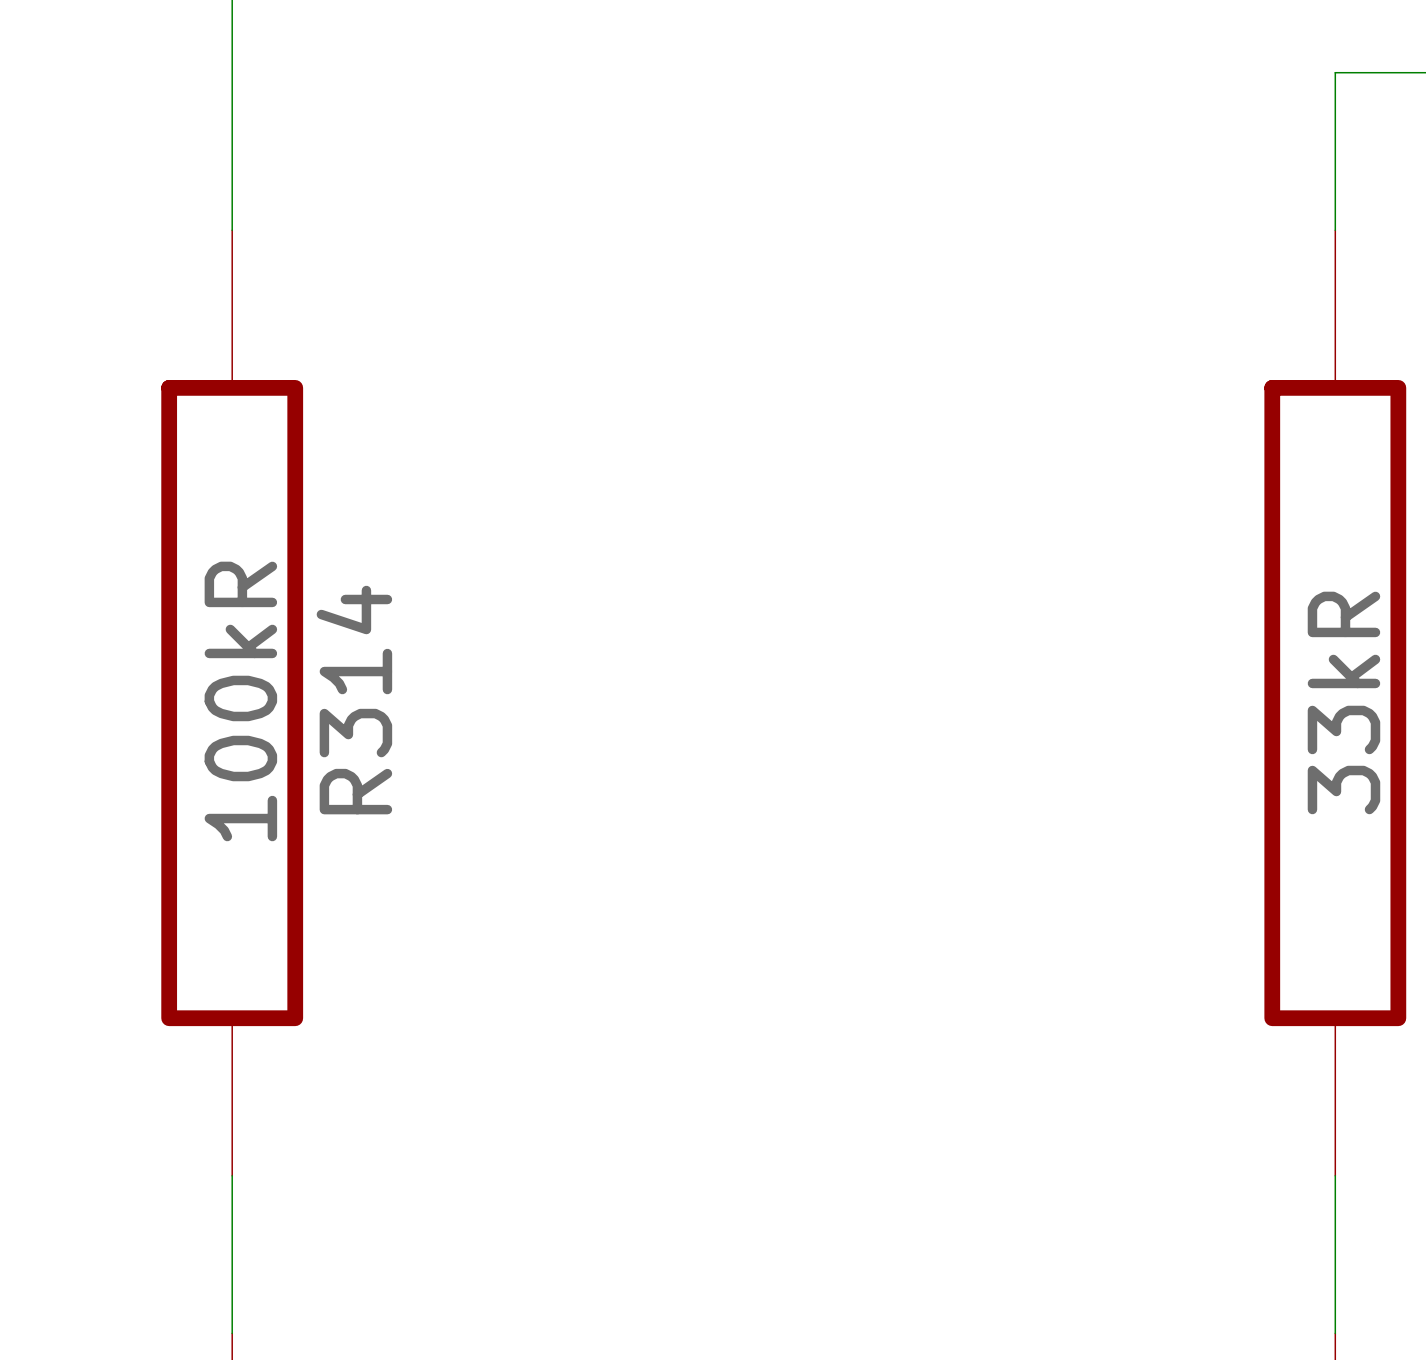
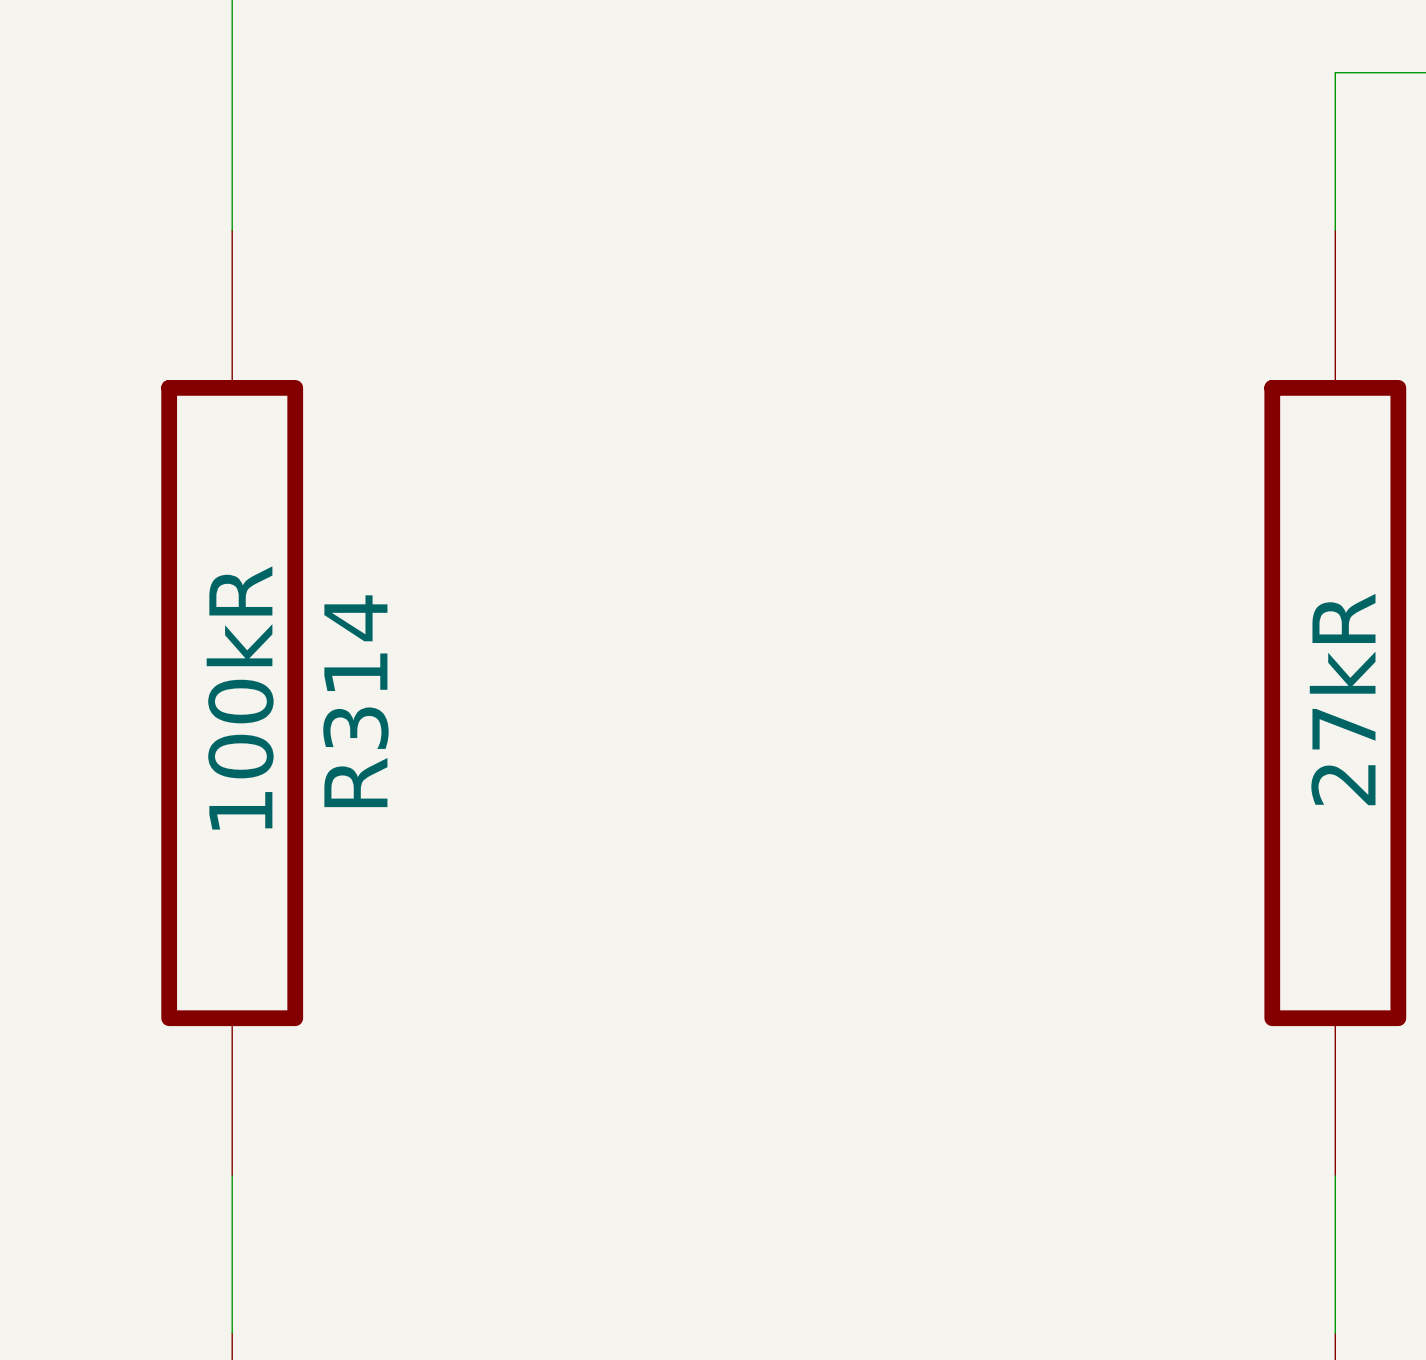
part value: 33kR (1343, 702) -> 27kR (1342, 699)

